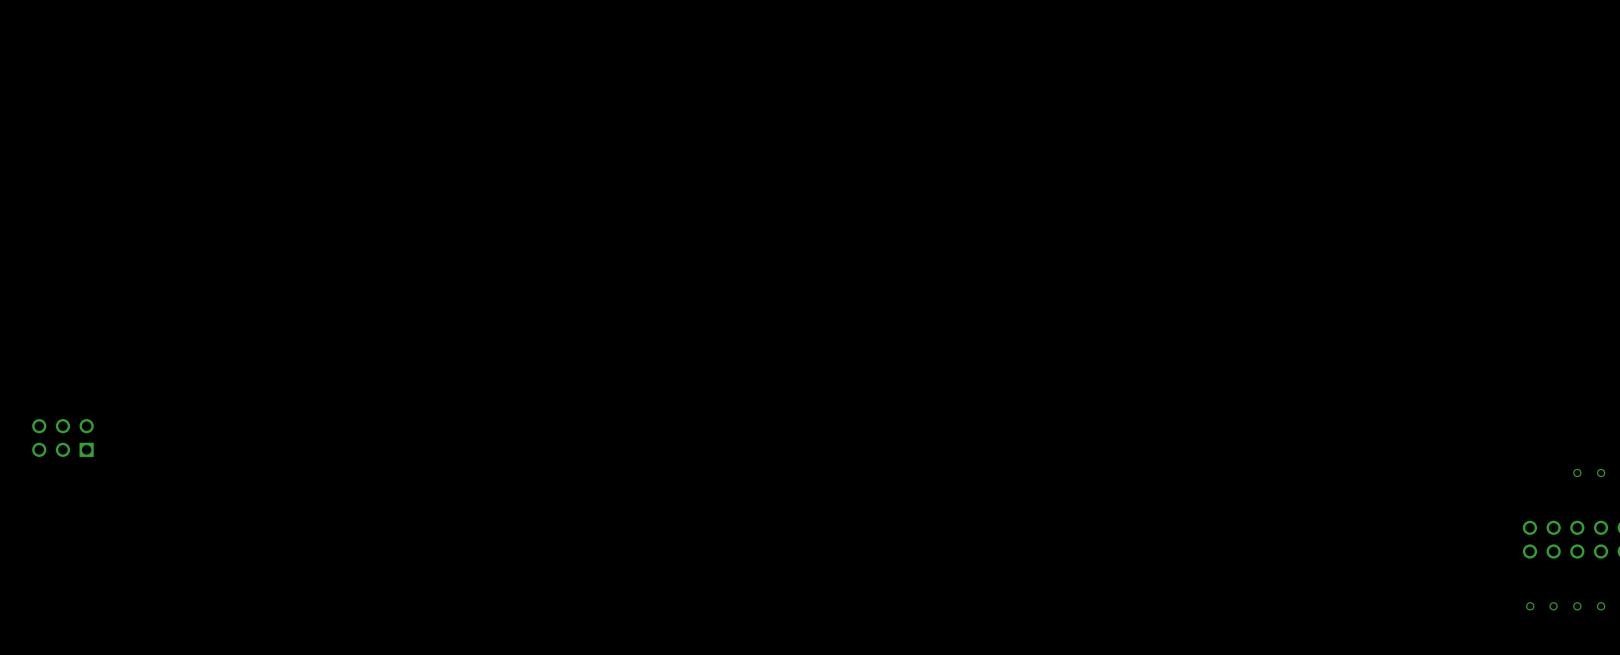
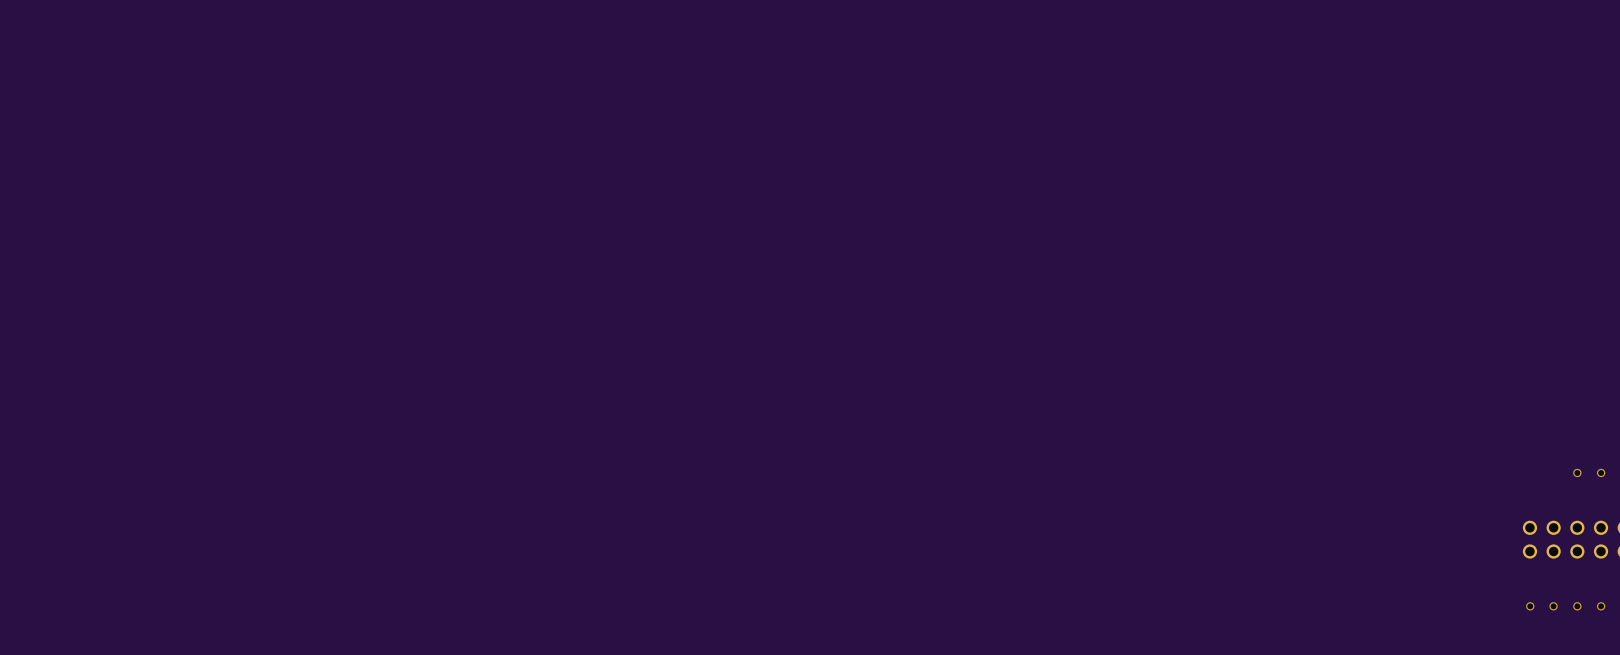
part: (62, 437) -> none

